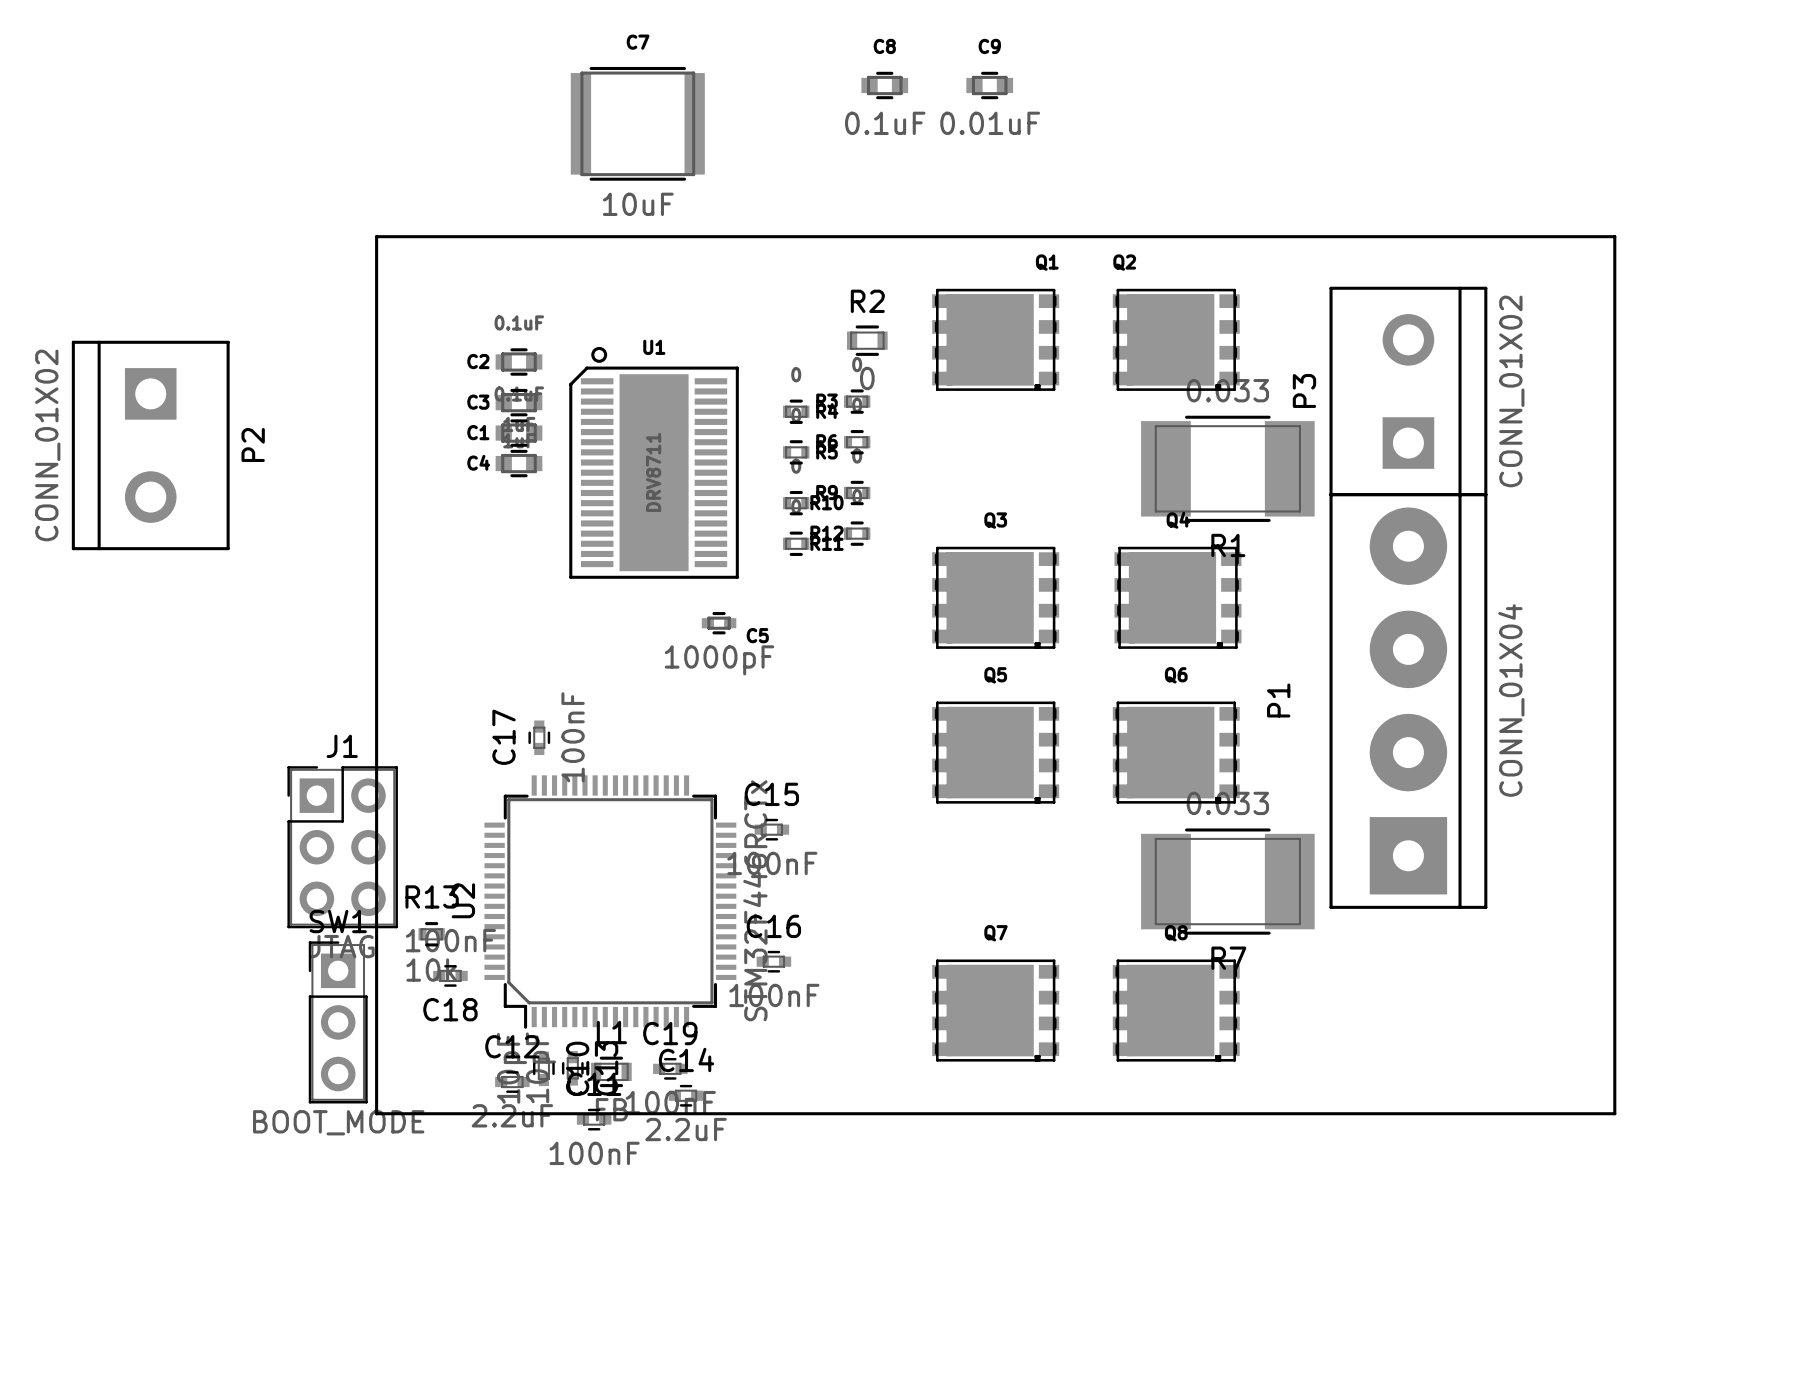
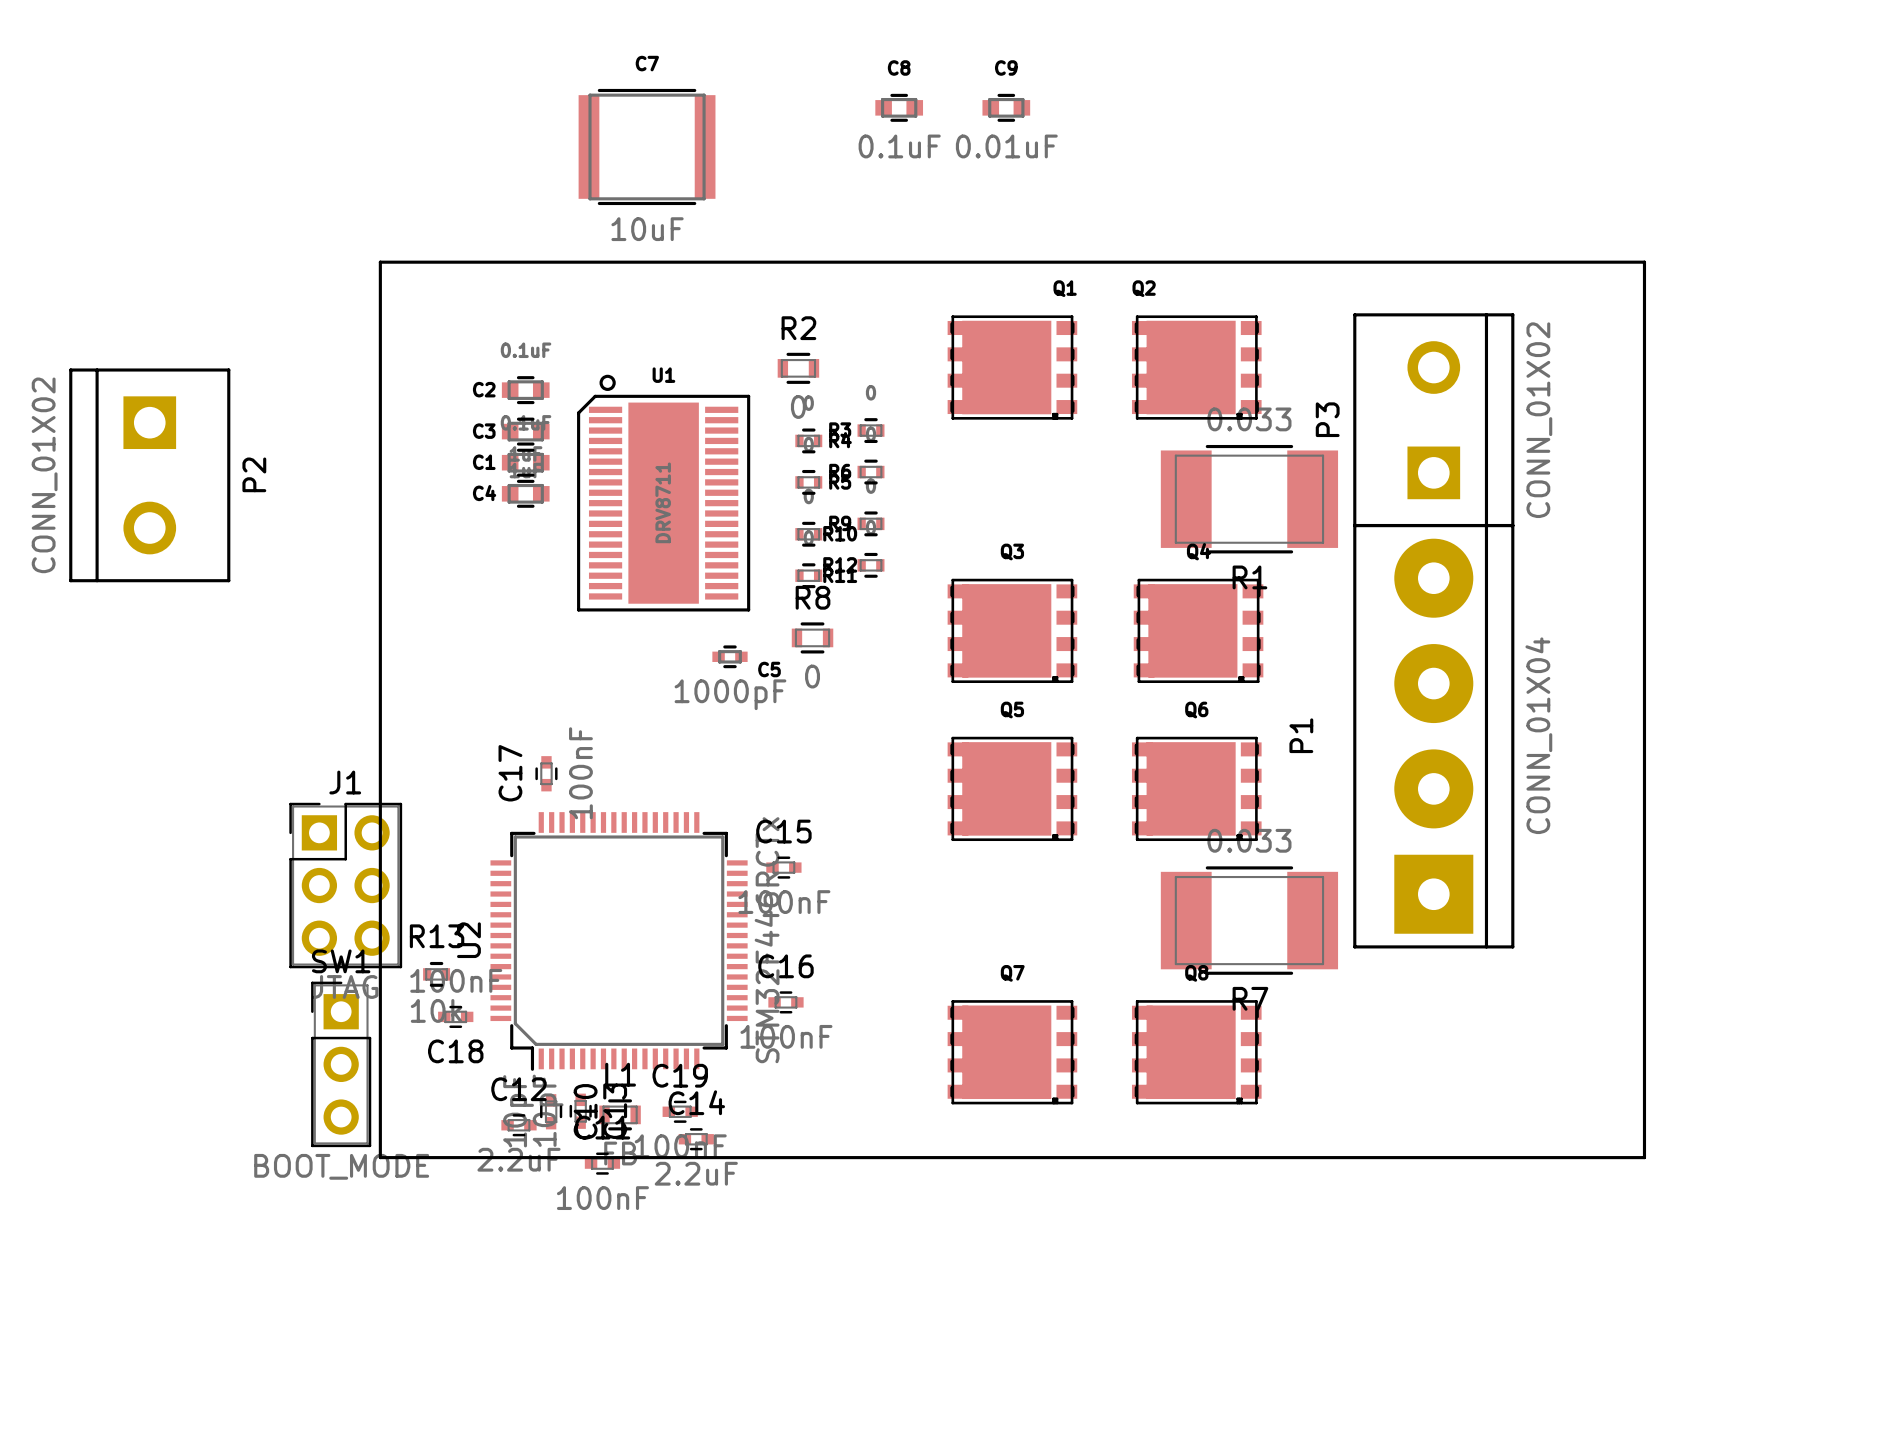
R2 position: (867, 340) -> (798, 368)
R8: none -> 0 (812, 637)

